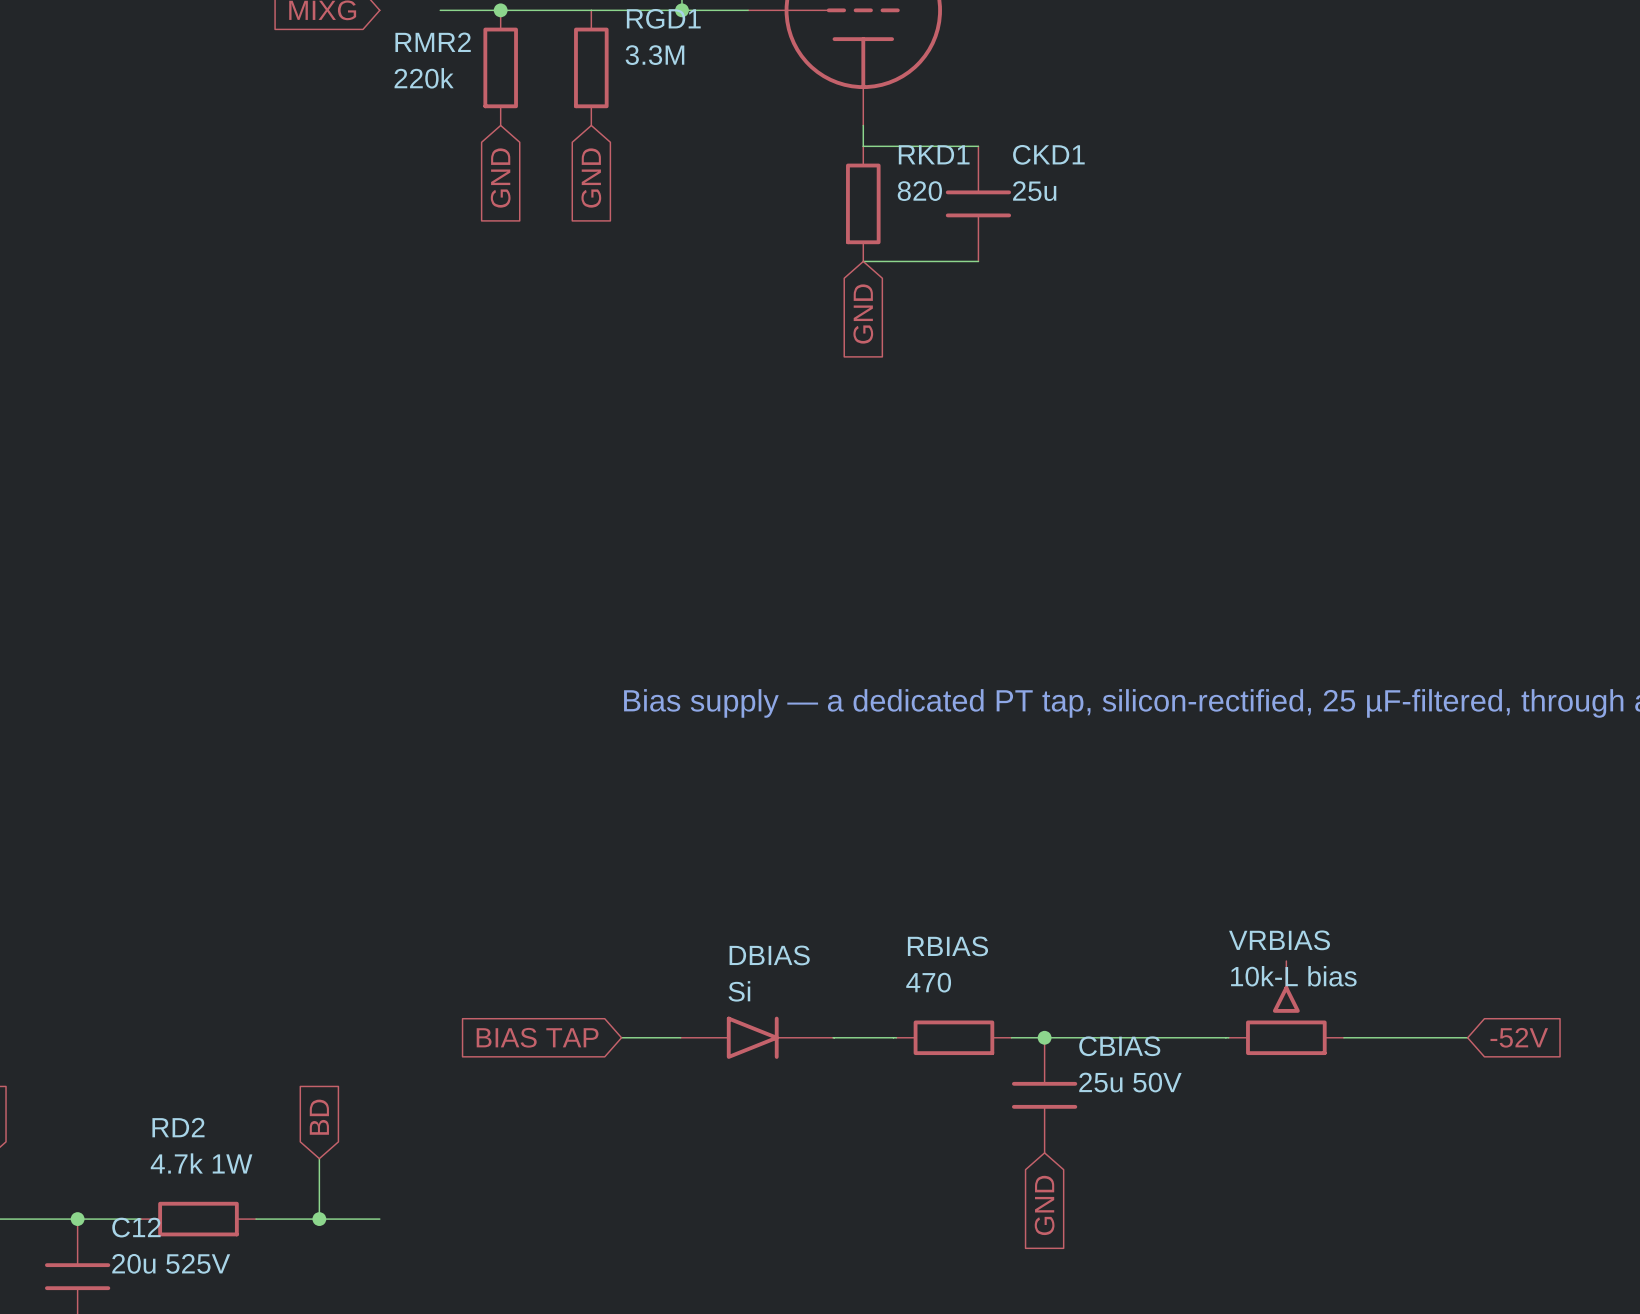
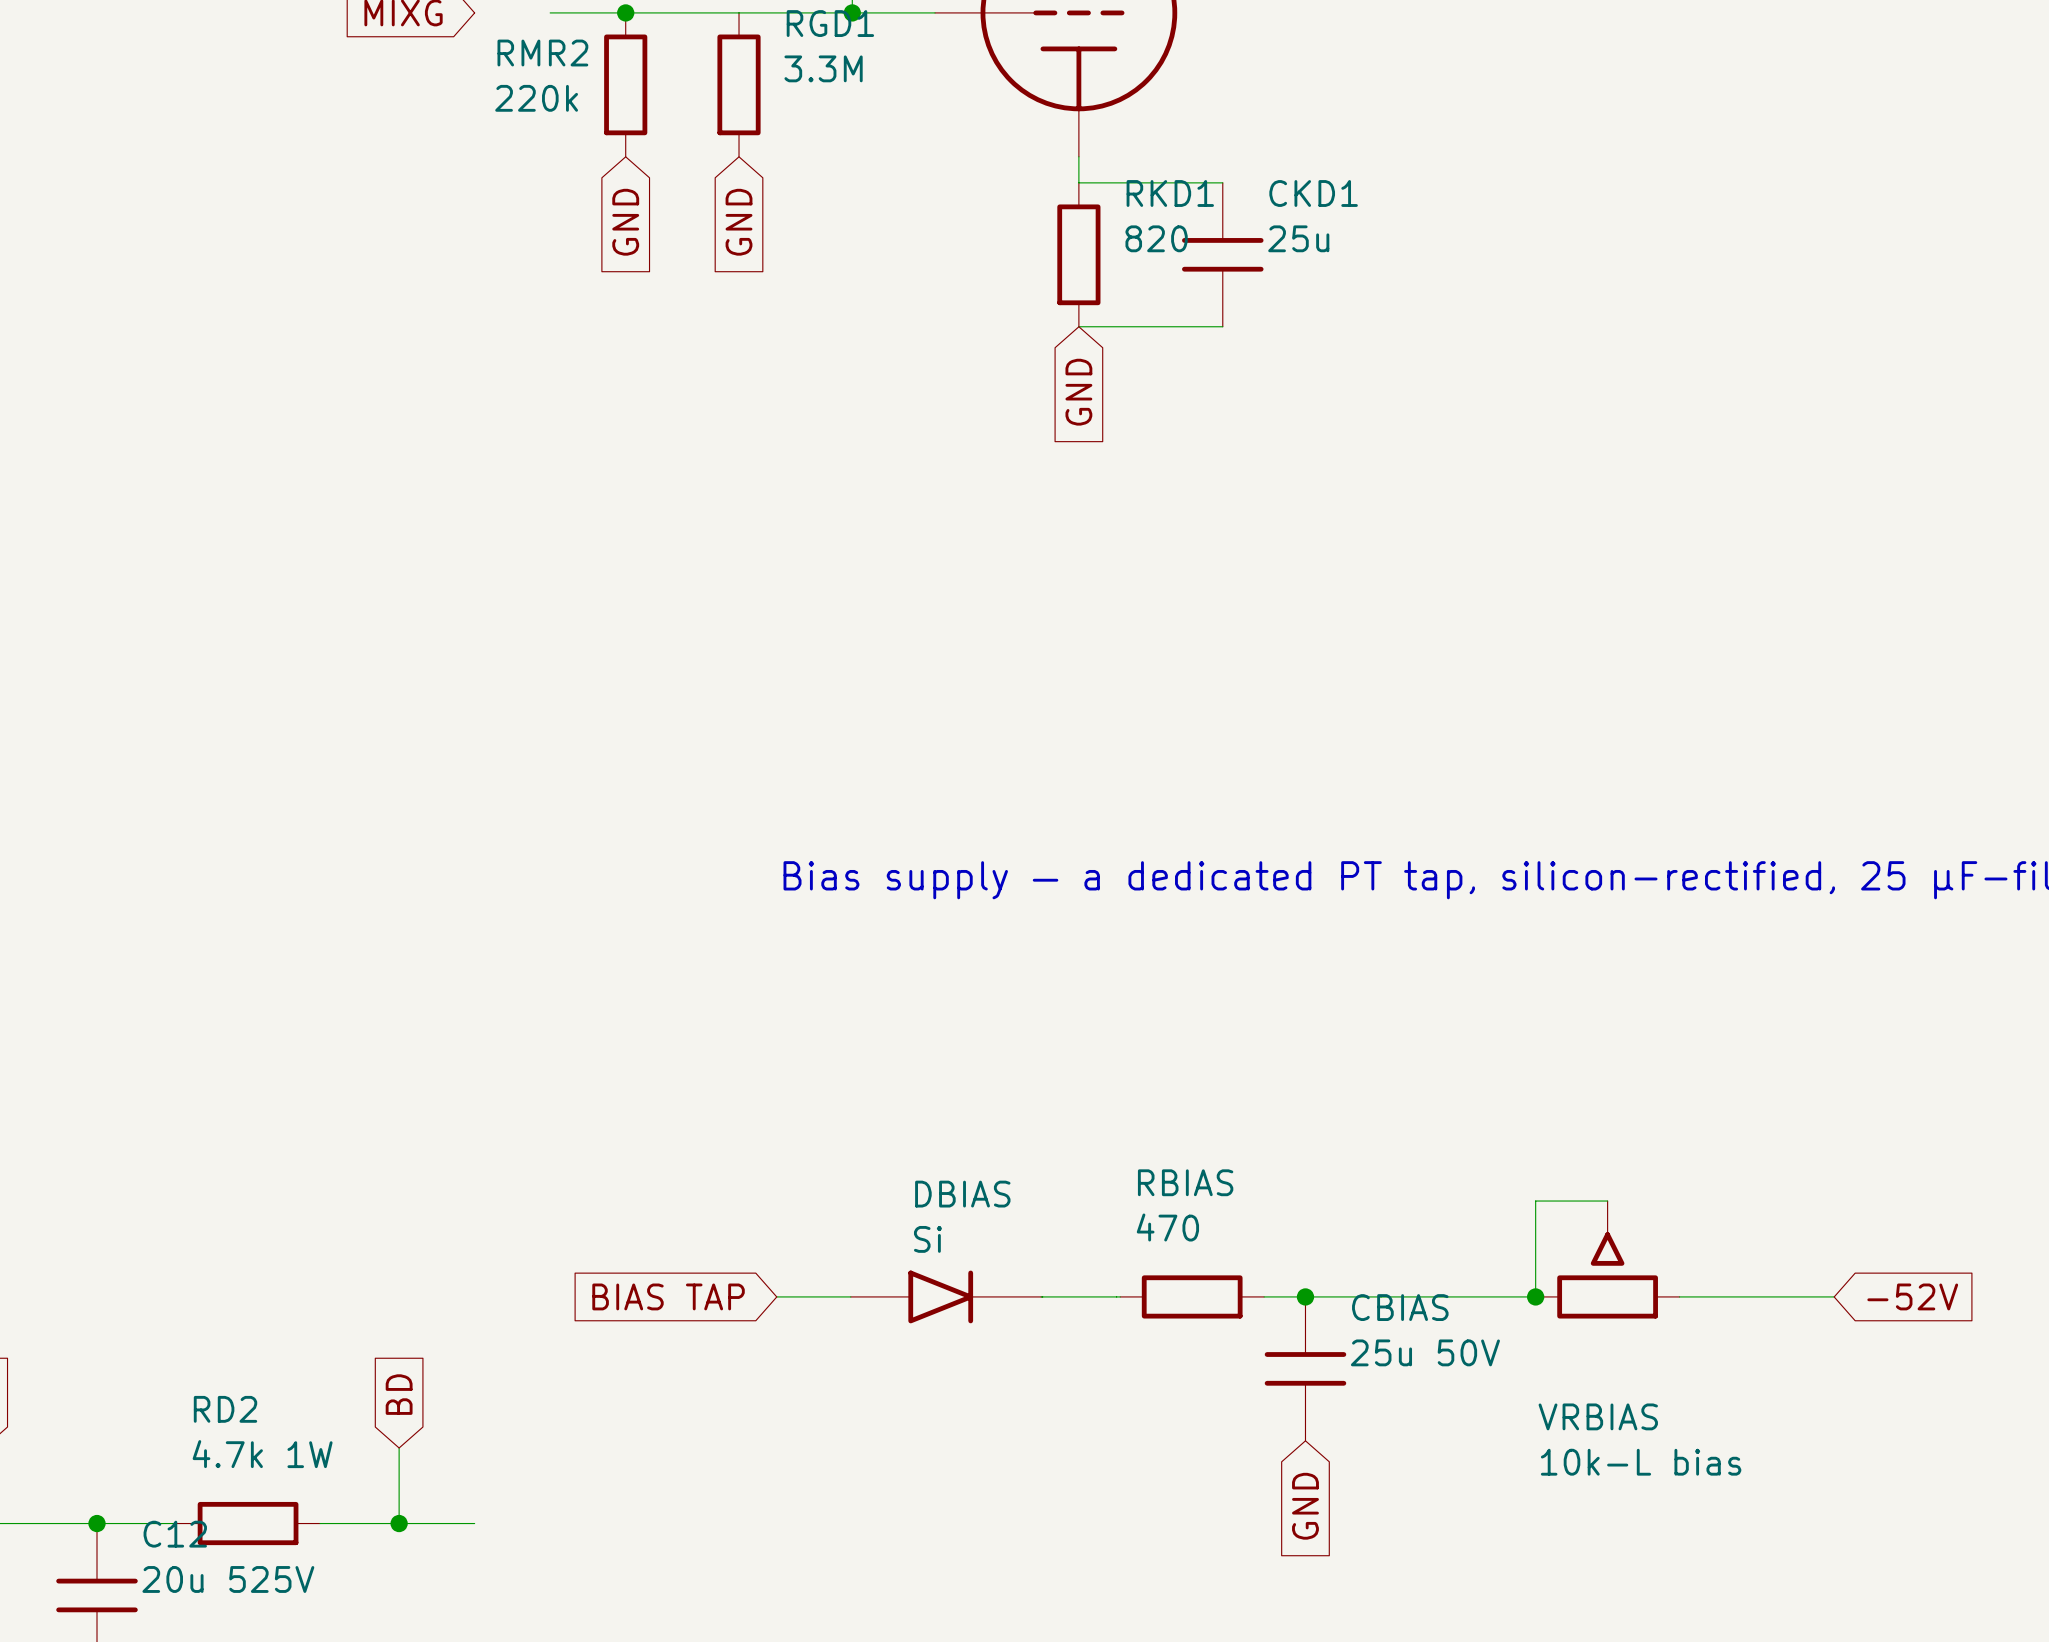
VRBIAS name position: VRBIAS (1279, 940) -> VRBIAS (1598, 1416)
wire: none -> (1607, 1201) (1535, 1201) (1535, 1296)
VRBIAS value position: 10k-L bias (1293, 976) -> 10k-L bias (1641, 1462)
junction: none -> (1535, 1296)

